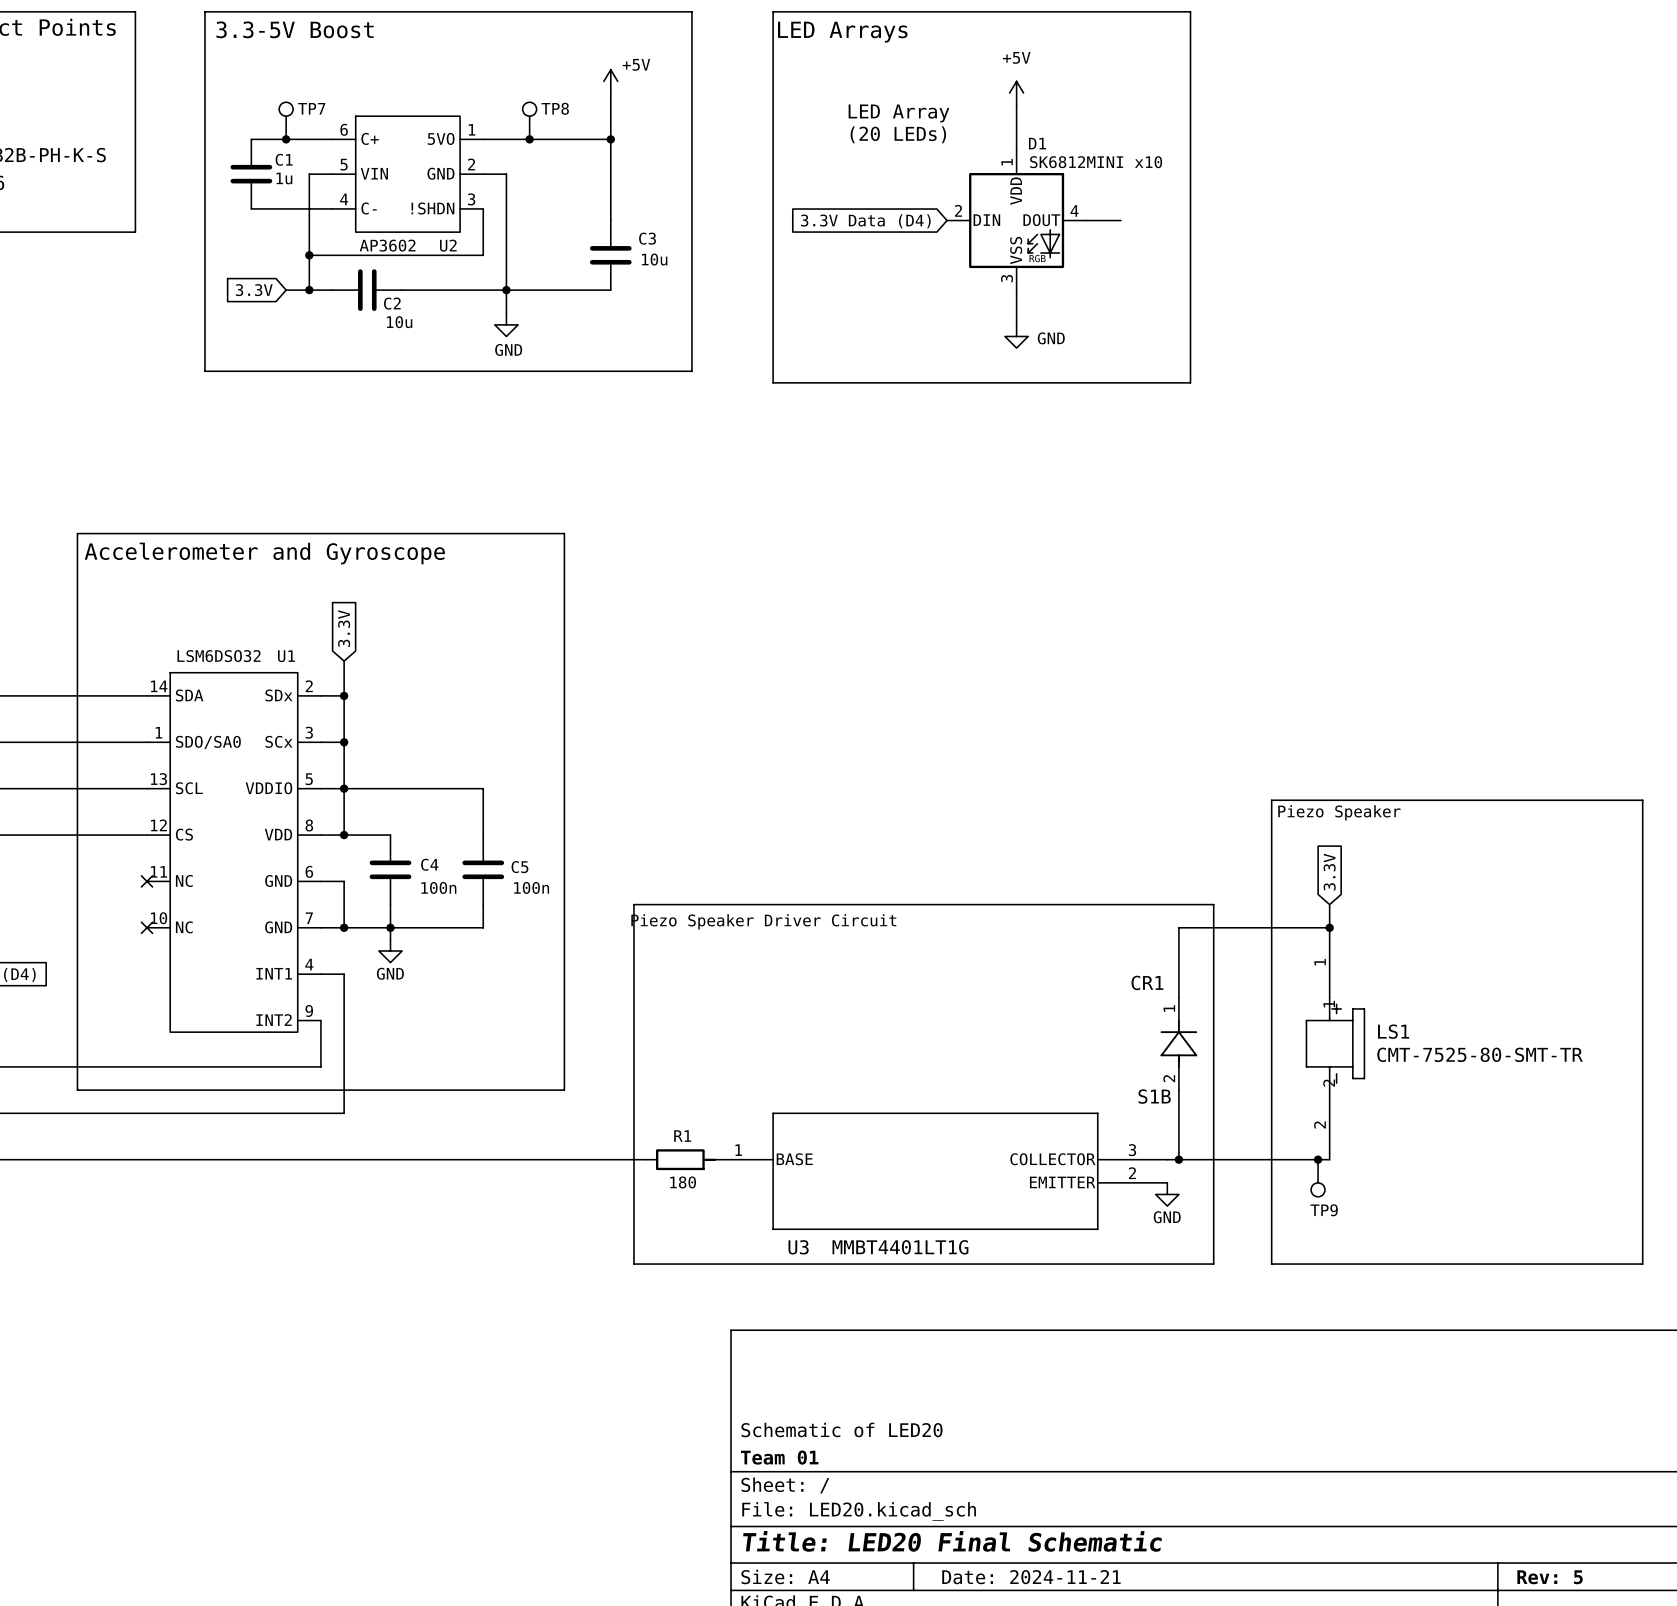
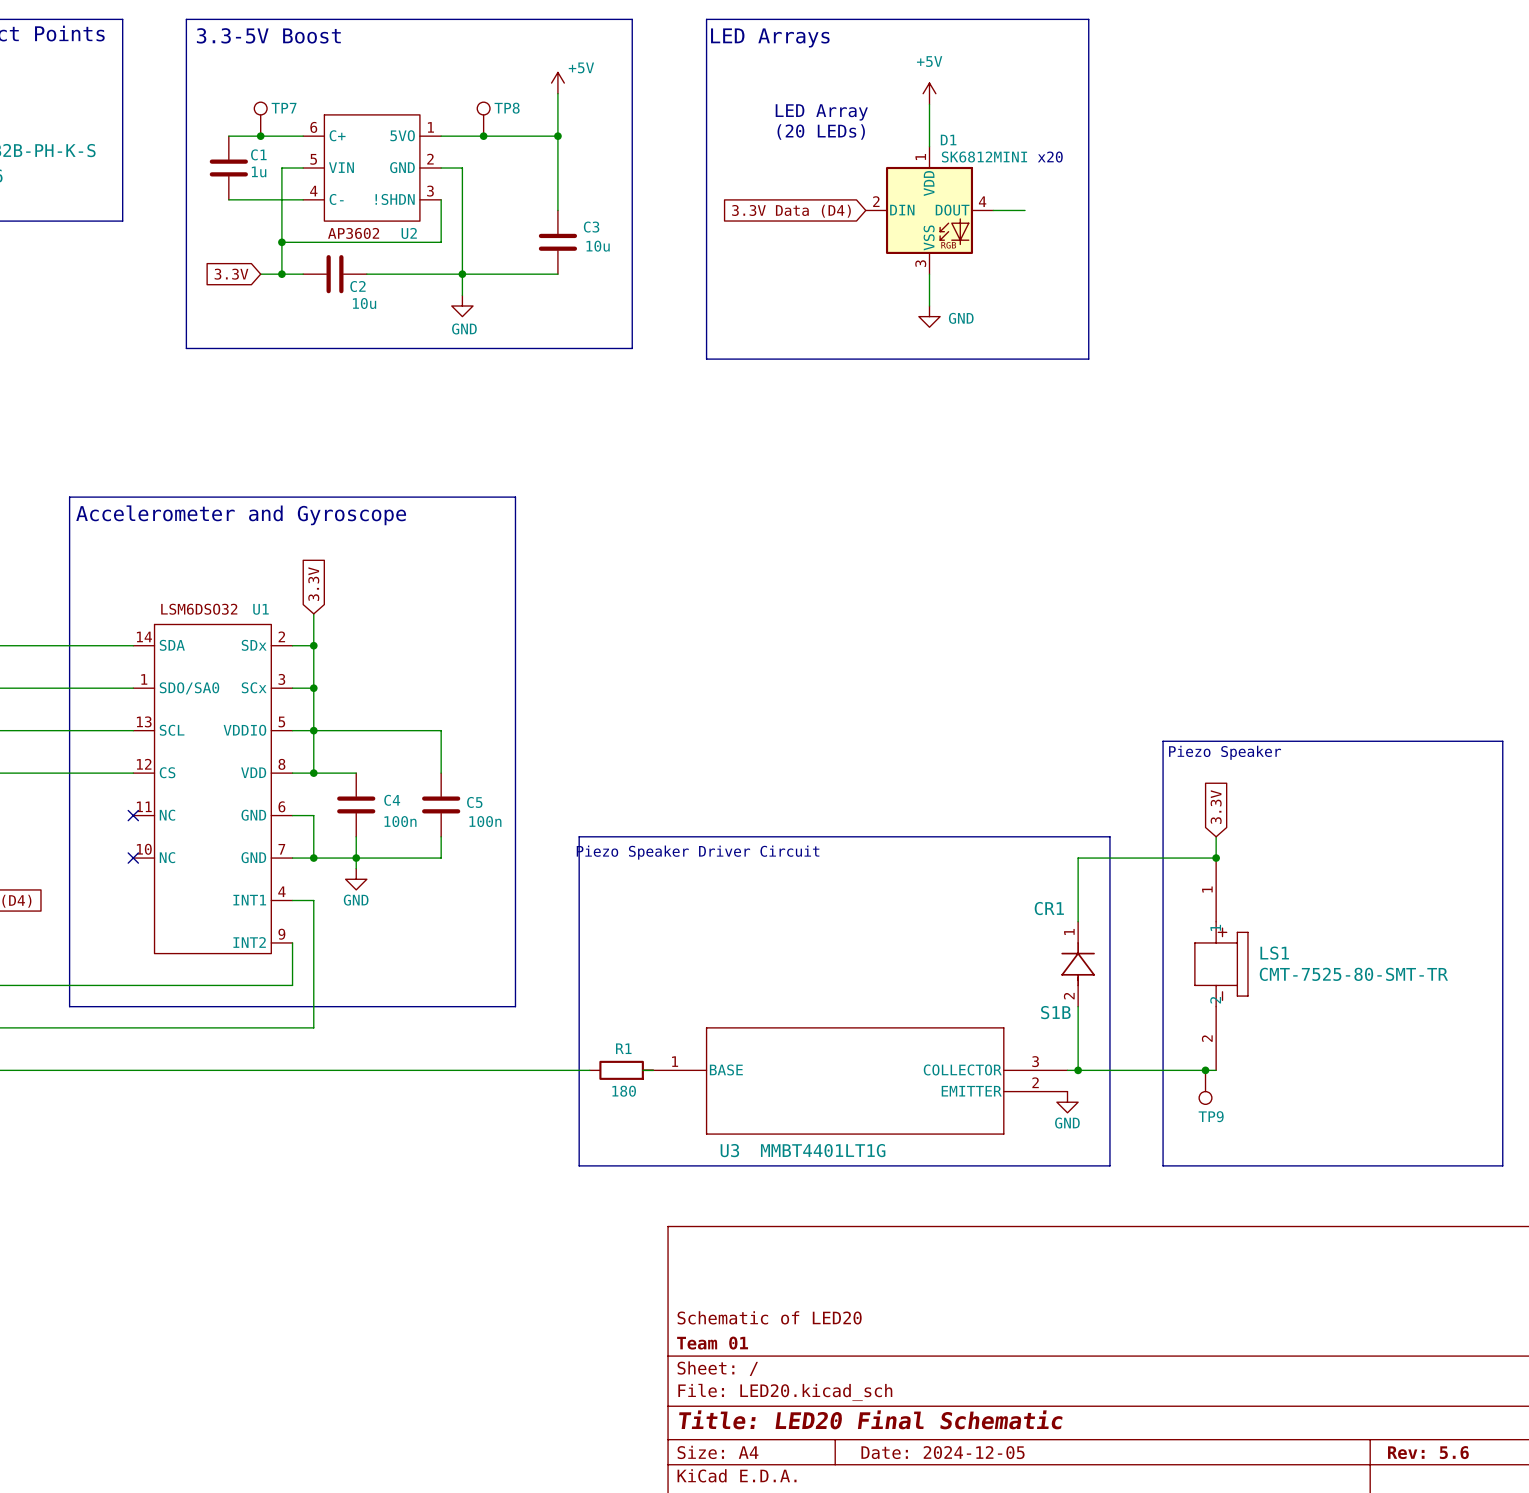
text: x10 (1148, 162) -> x20 (1050, 157)
title block: Date: 2024-11-21 (1031, 1577) -> Date: 2024-12-05 (943, 1452)
title block: Rev: 5 (1550, 1577) -> Rev: 5.6 (1428, 1452)

